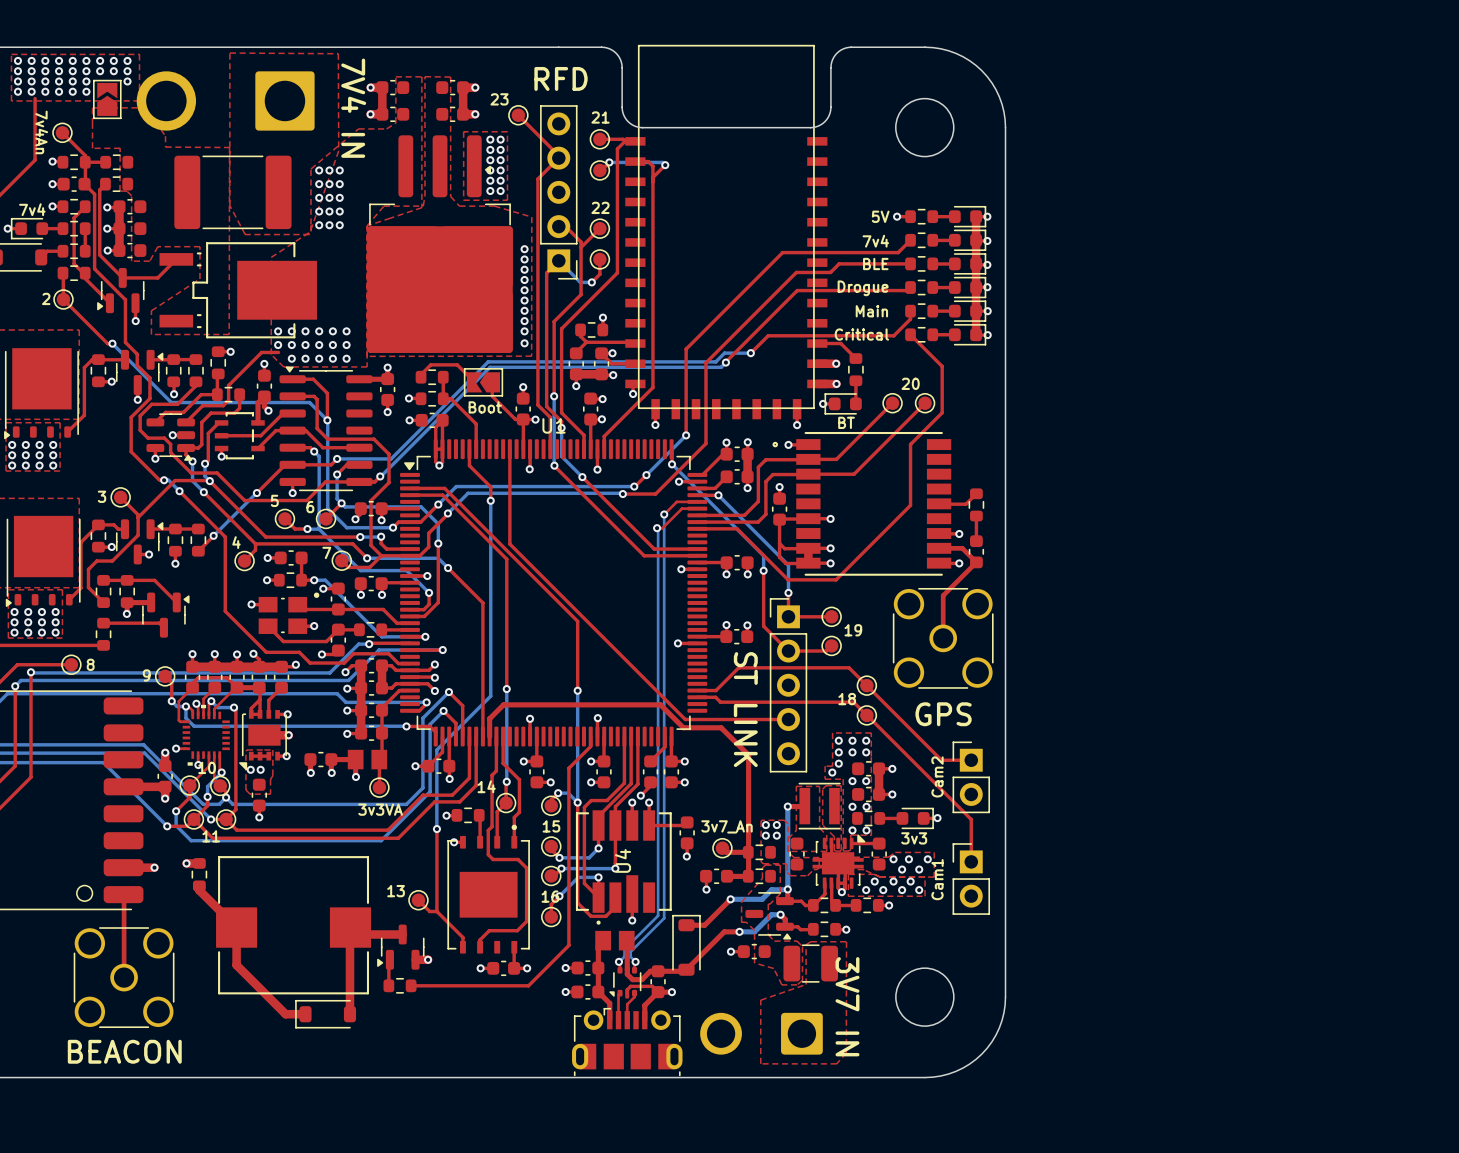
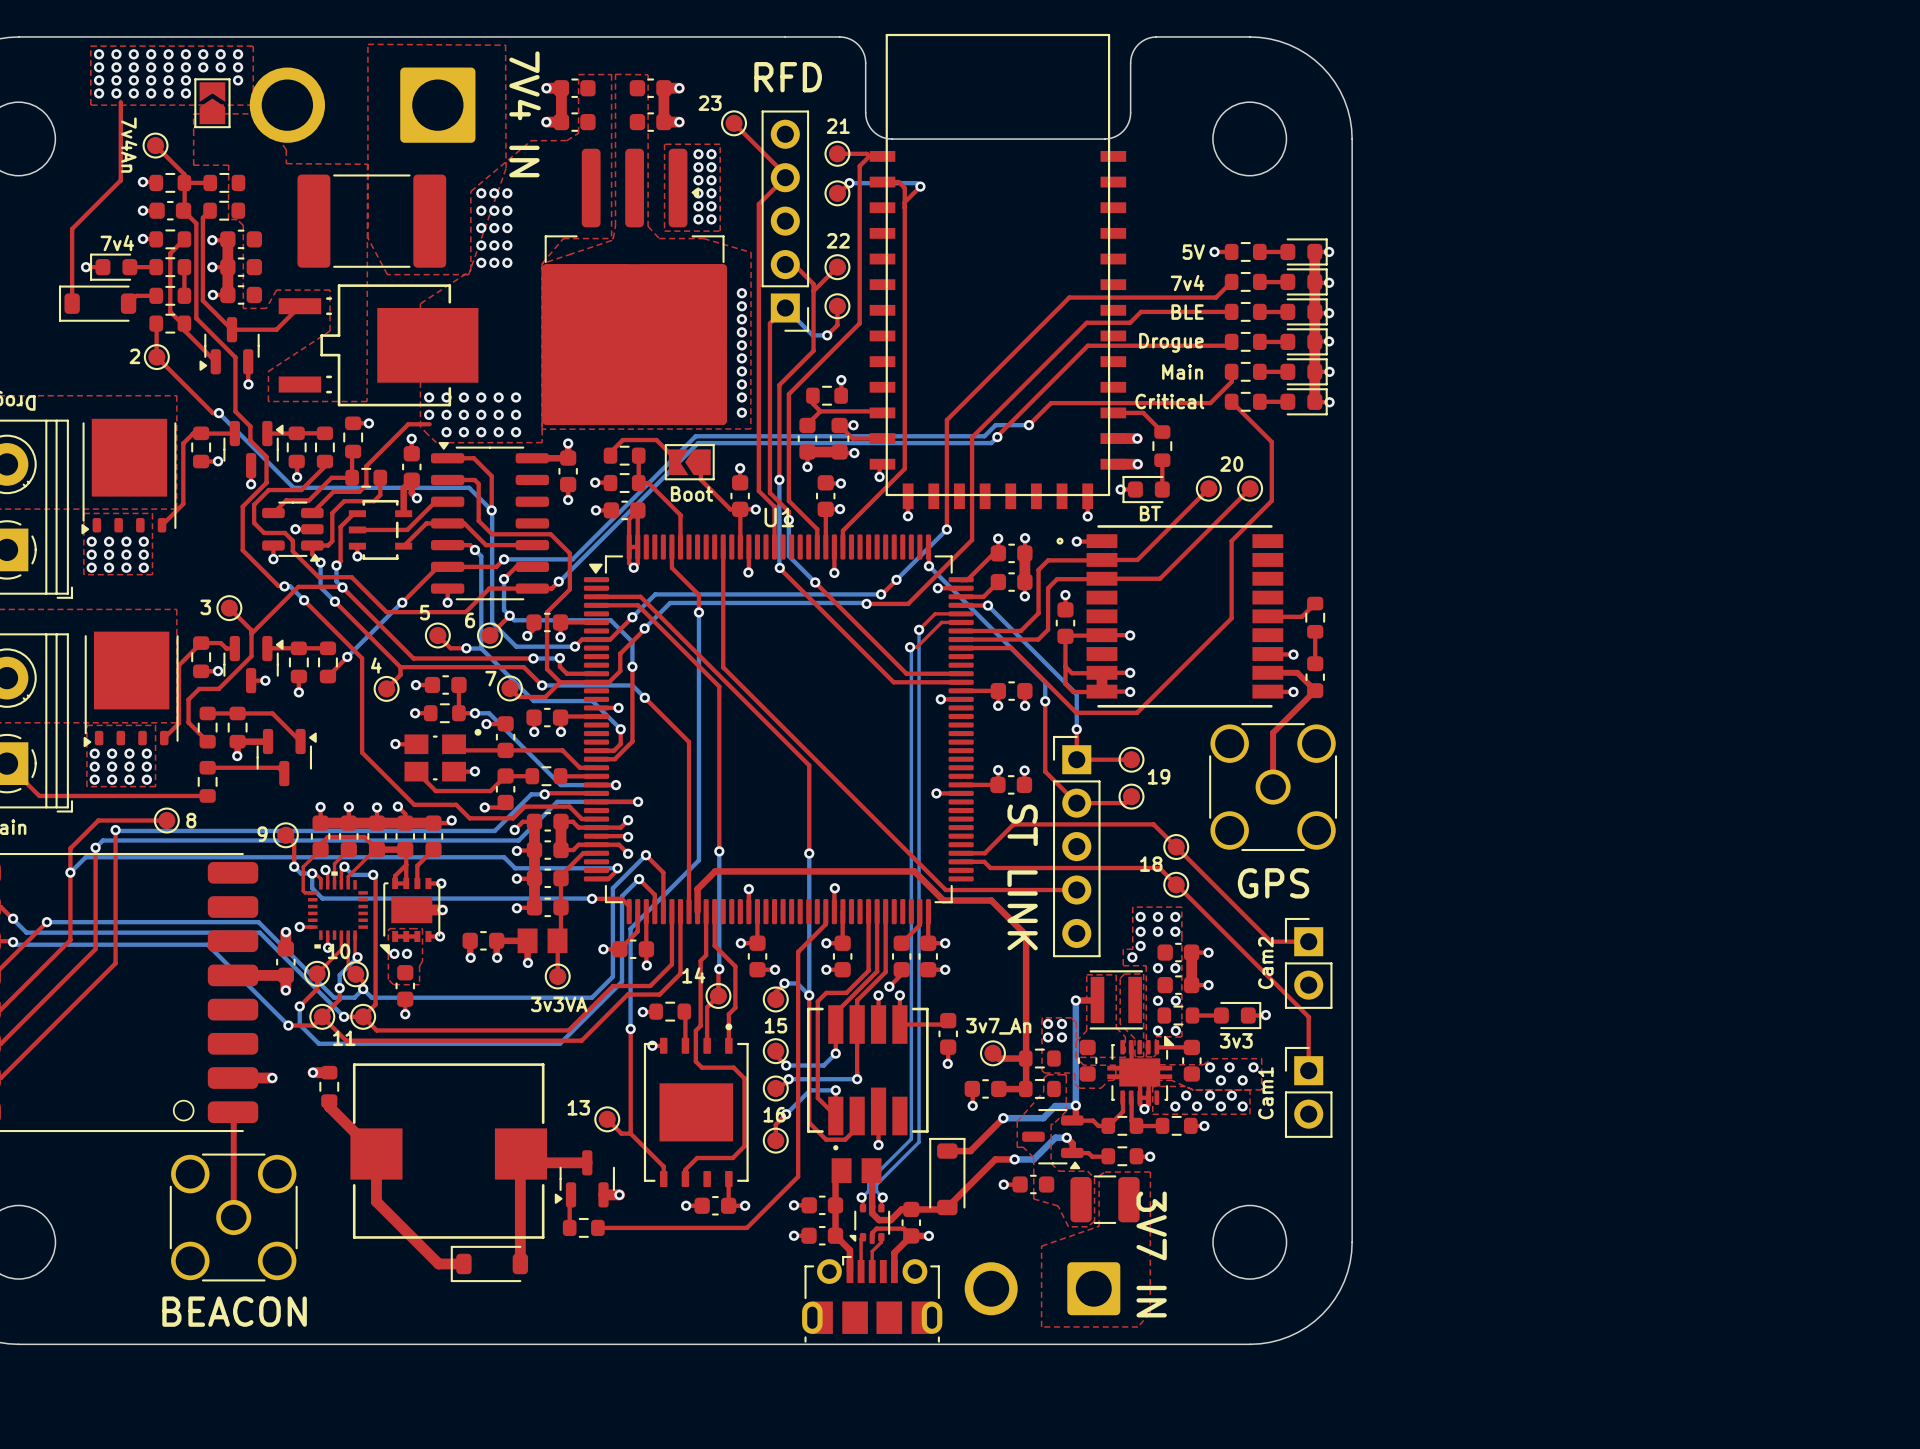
U4 name: U4 (623, 860) -> none

